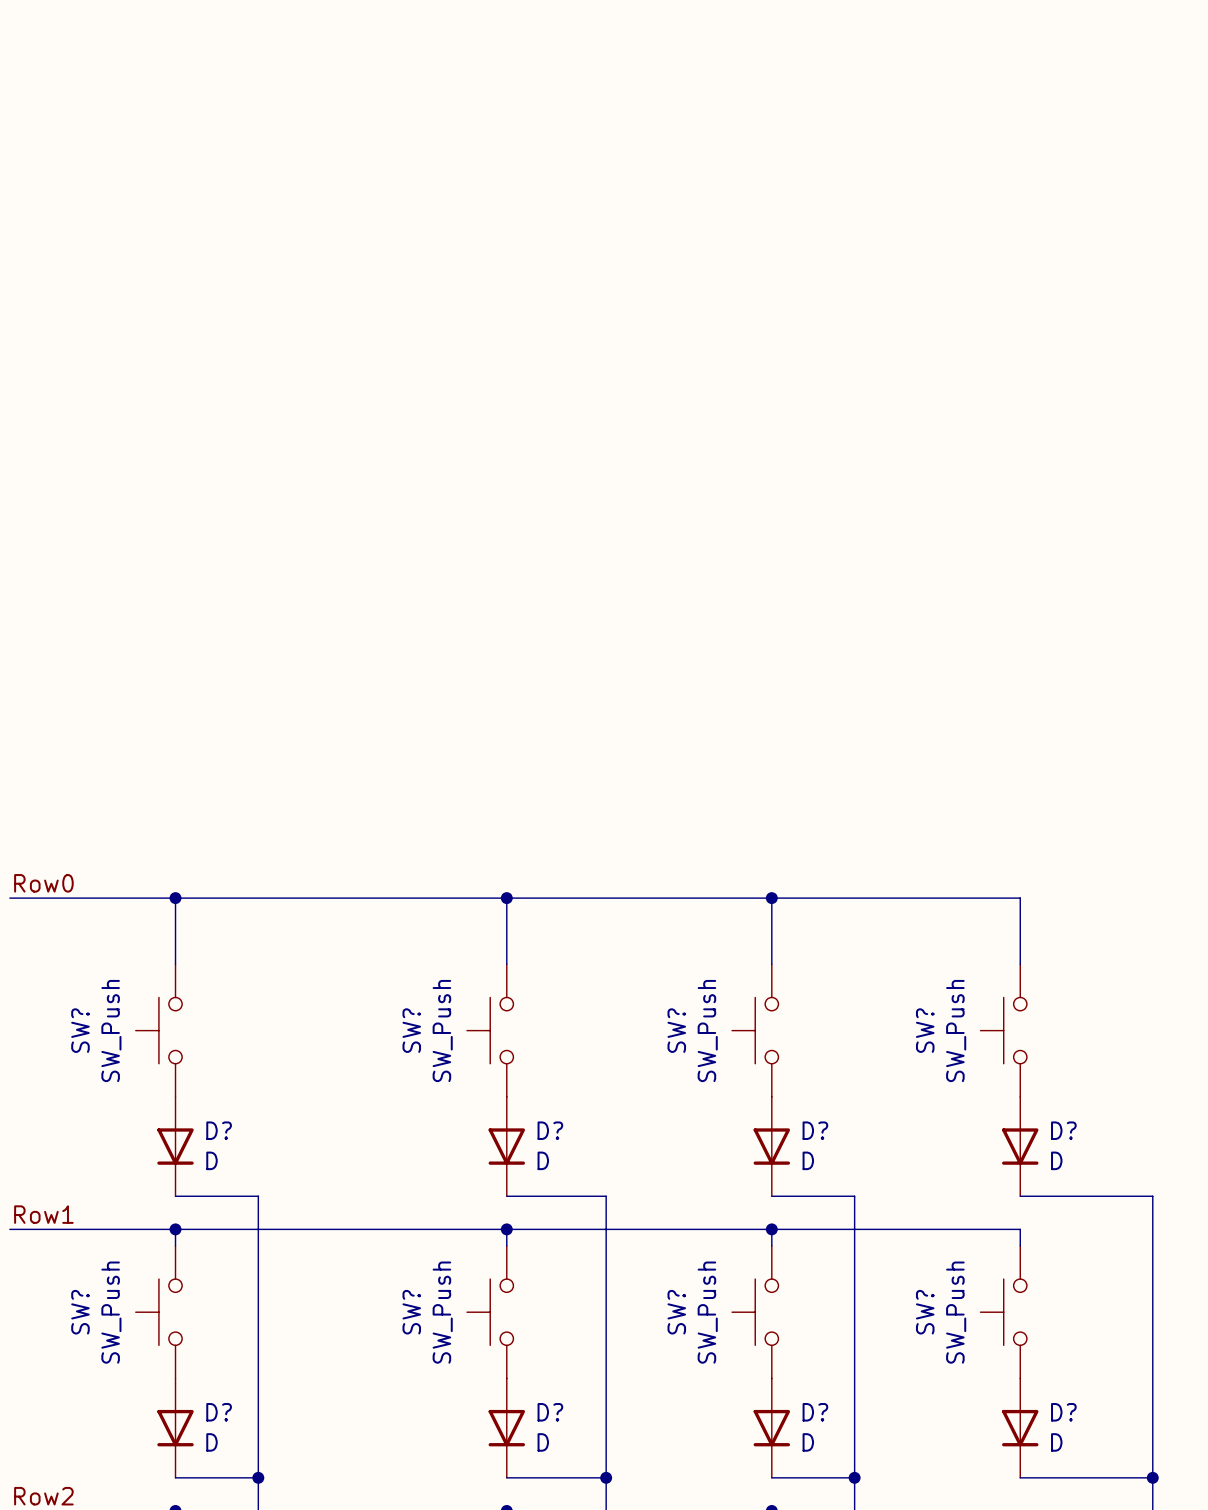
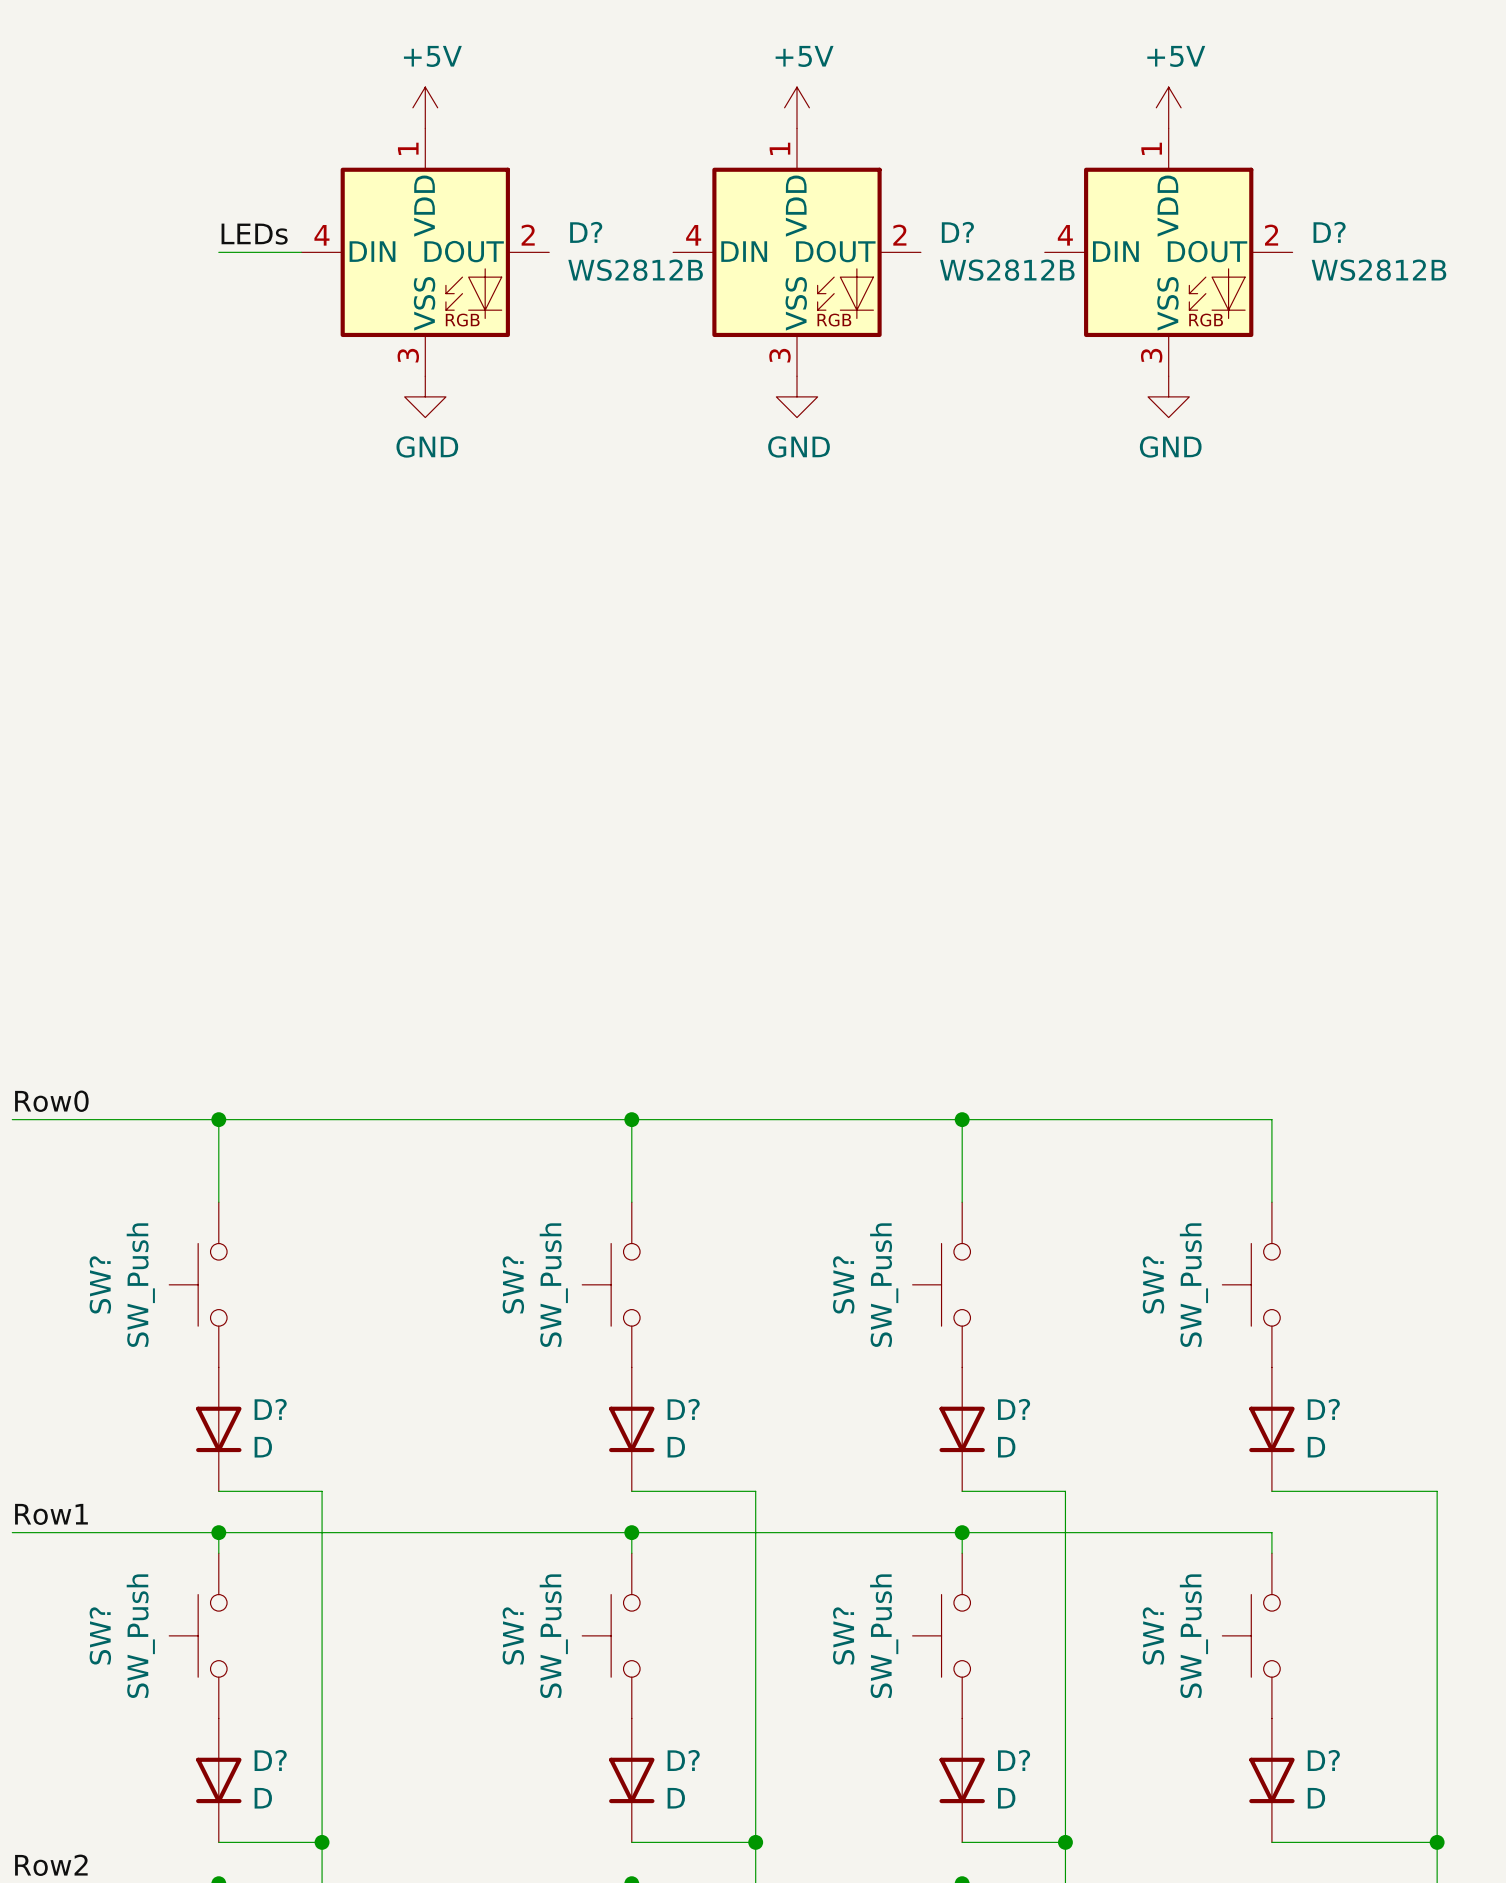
power symbol: none -> +5V (425, 107)
power symbol: none -> +5V (796, 107)
power symbol: none -> +5V (1168, 107)
label: none -> LEDs (254, 234)
wire: none -> (218, 252) (301, 252)
D?: none -> WS2812B (425, 252)
D?: none -> WS2812B (796, 252)
D?: none -> WS2812B (1168, 252)
power symbol: none -> GND (425, 396)
power symbol: none -> GND (796, 396)
power symbol: none -> GND (1168, 396)

